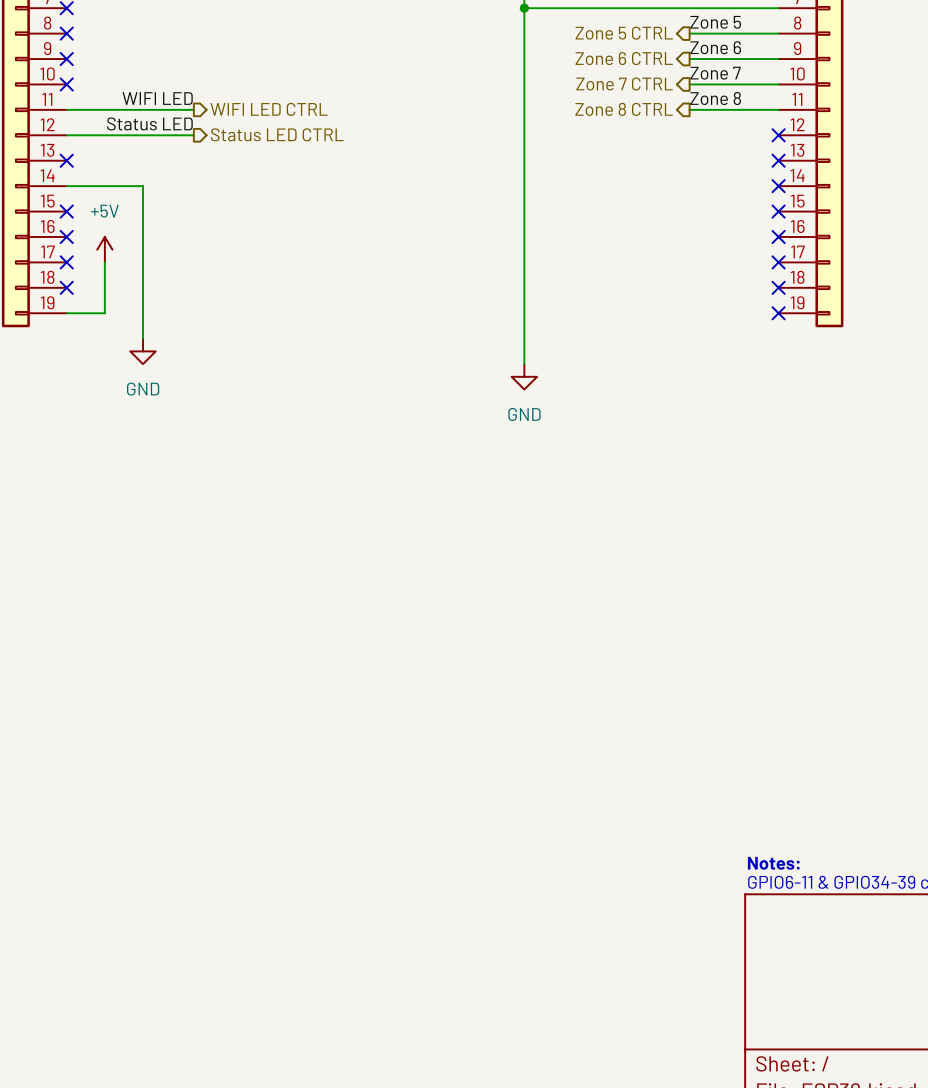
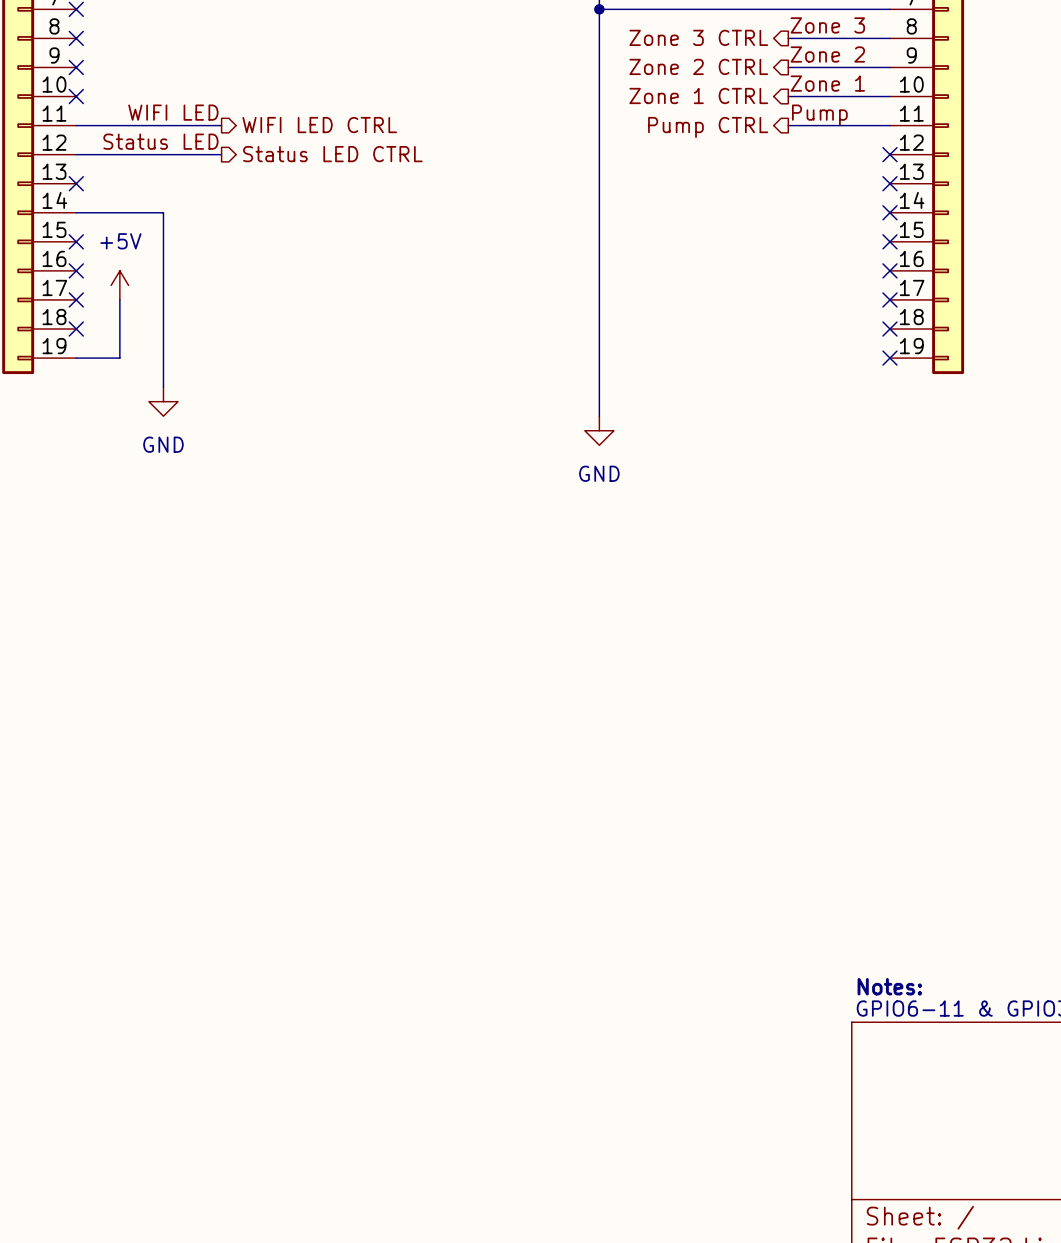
label: Zone 5 (715, 22) -> Zone 3 (827, 25)
hierarchical label: Zone 5 CTRL (624, 33) -> Zone 3 CTRL (698, 37)
label: Zone 6 (715, 47) -> Zone 2 (827, 54)
hierarchical label: Zone 6 CTRL (624, 58) -> Zone 2 CTRL (698, 66)
label: Zone 7 (715, 73) -> Zone 1 (827, 83)
hierarchical label: Zone 7 CTRL (624, 83) -> Zone 1 CTRL (698, 95)
label: Zone 8 (715, 98) -> Pump (819, 115)
hierarchical label: Zone 8 CTRL (624, 109) -> Pump CTRL (708, 127)

